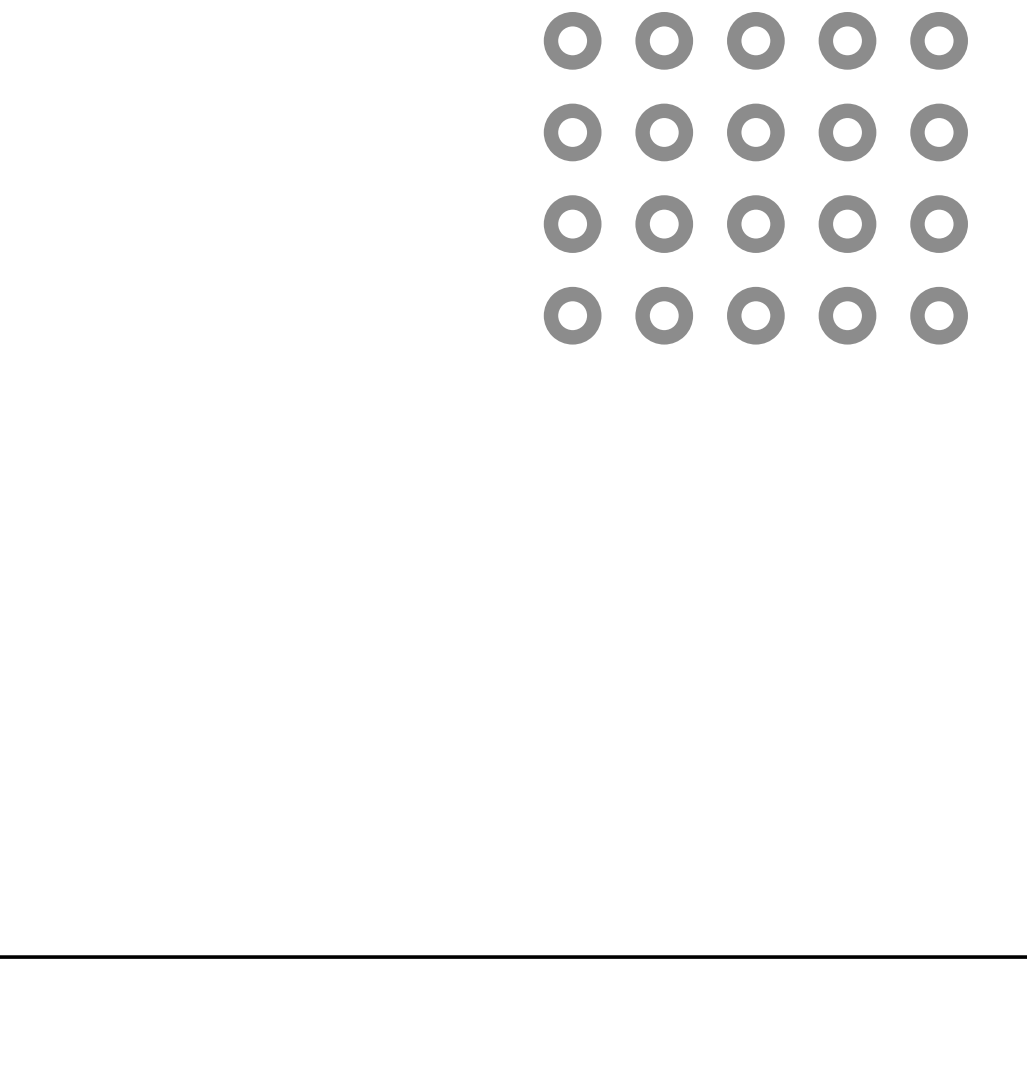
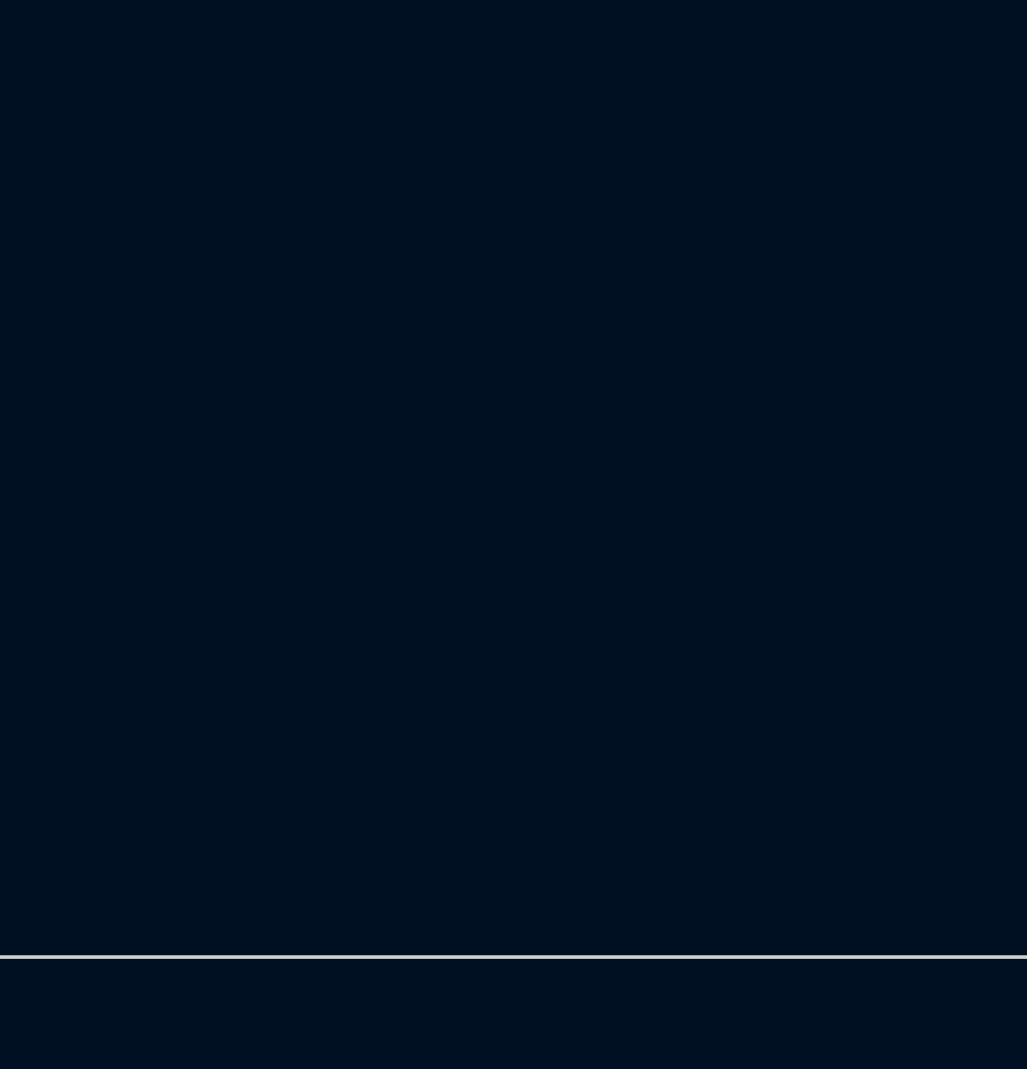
via: (572, 40) -> none
via: (664, 40) -> none
via: (755, 40) -> none
via: (847, 40) -> none
via: (939, 40) -> none
via: (572, 132) -> none
via: (664, 132) -> none
via: (755, 132) -> none
via: (847, 132) -> none
via: (939, 132) -> none
via: (572, 224) -> none
via: (664, 224) -> none
via: (755, 224) -> none
via: (847, 224) -> none
via: (939, 224) -> none
via: (572, 315) -> none
via: (664, 315) -> none
via: (755, 315) -> none
via: (847, 315) -> none
via: (939, 315) -> none

